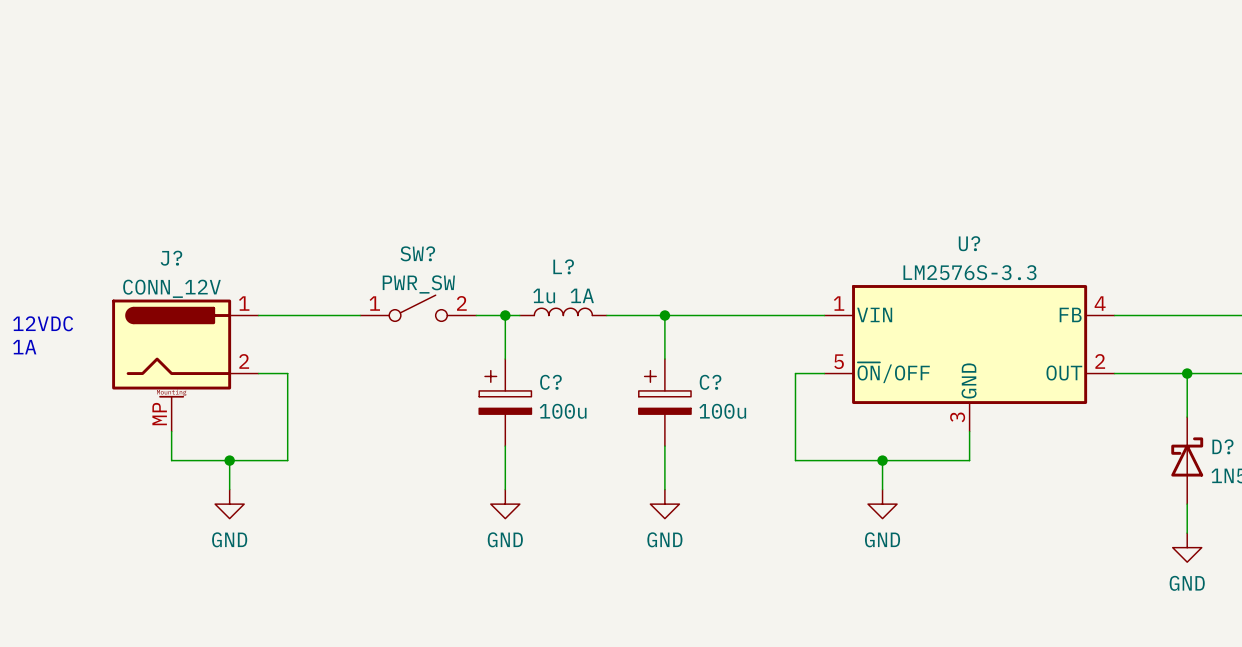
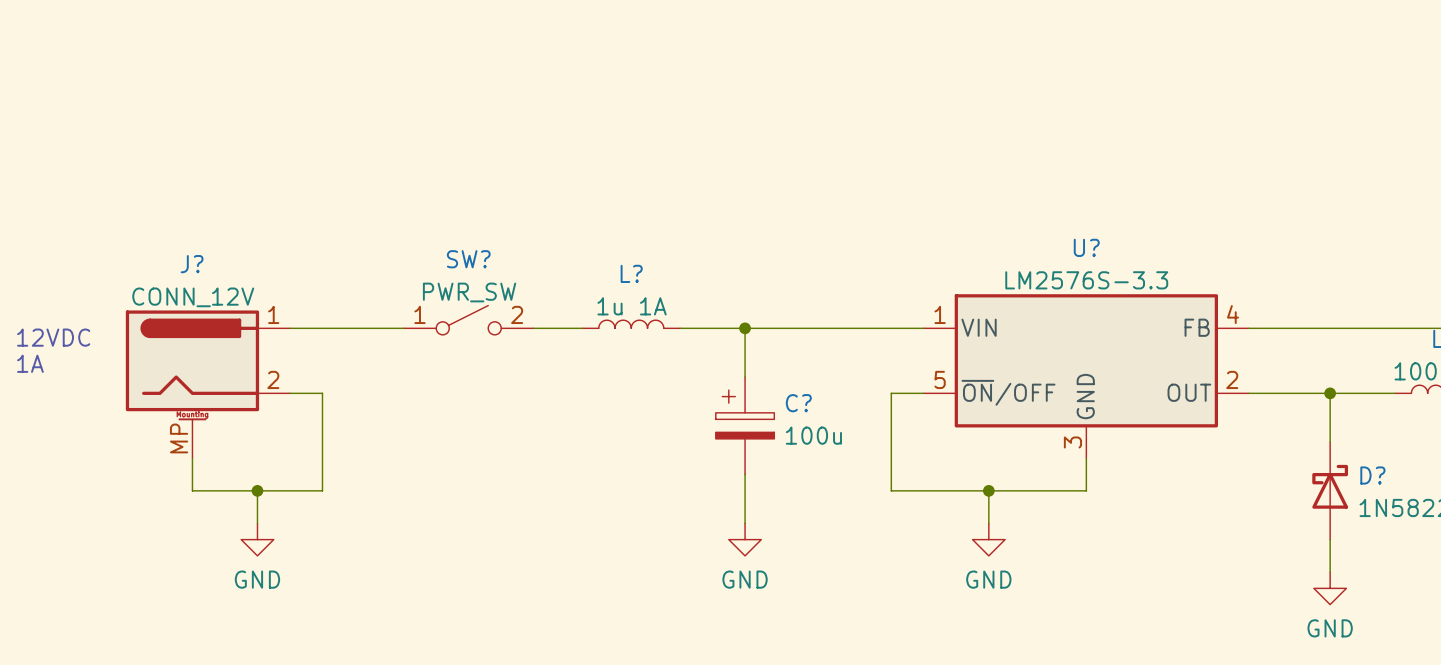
wire: (505, 315) (505, 359) -> none
junction: (505, 315) -> none
C?: 100u (505, 402) -> none
wire: (505, 446) (505, 489) -> none
power symbol: GND (505, 504) -> none

